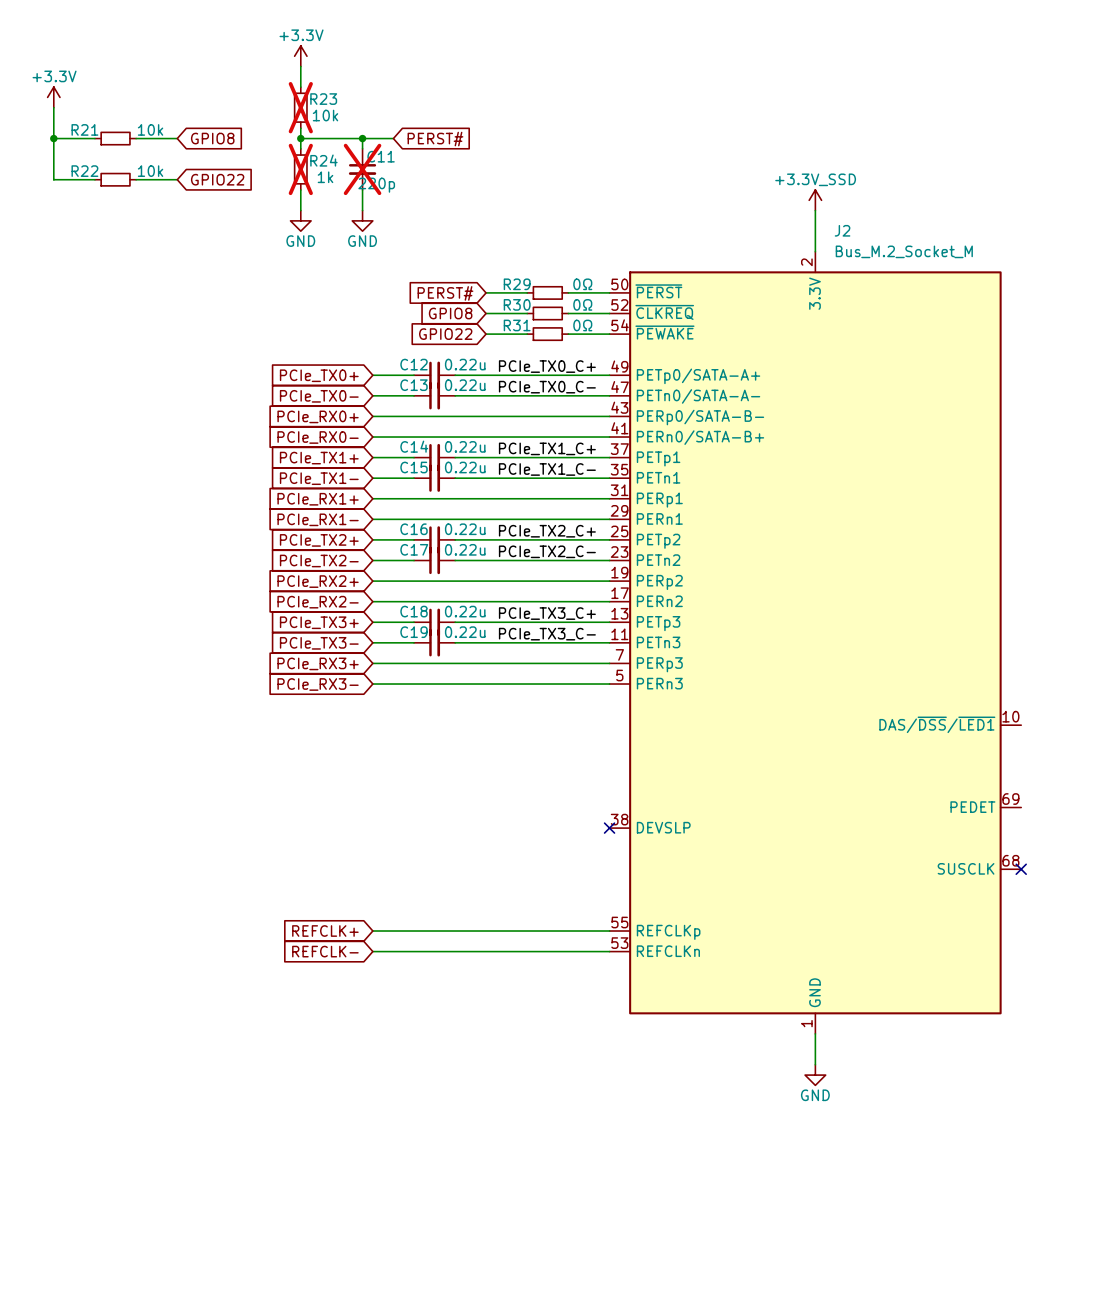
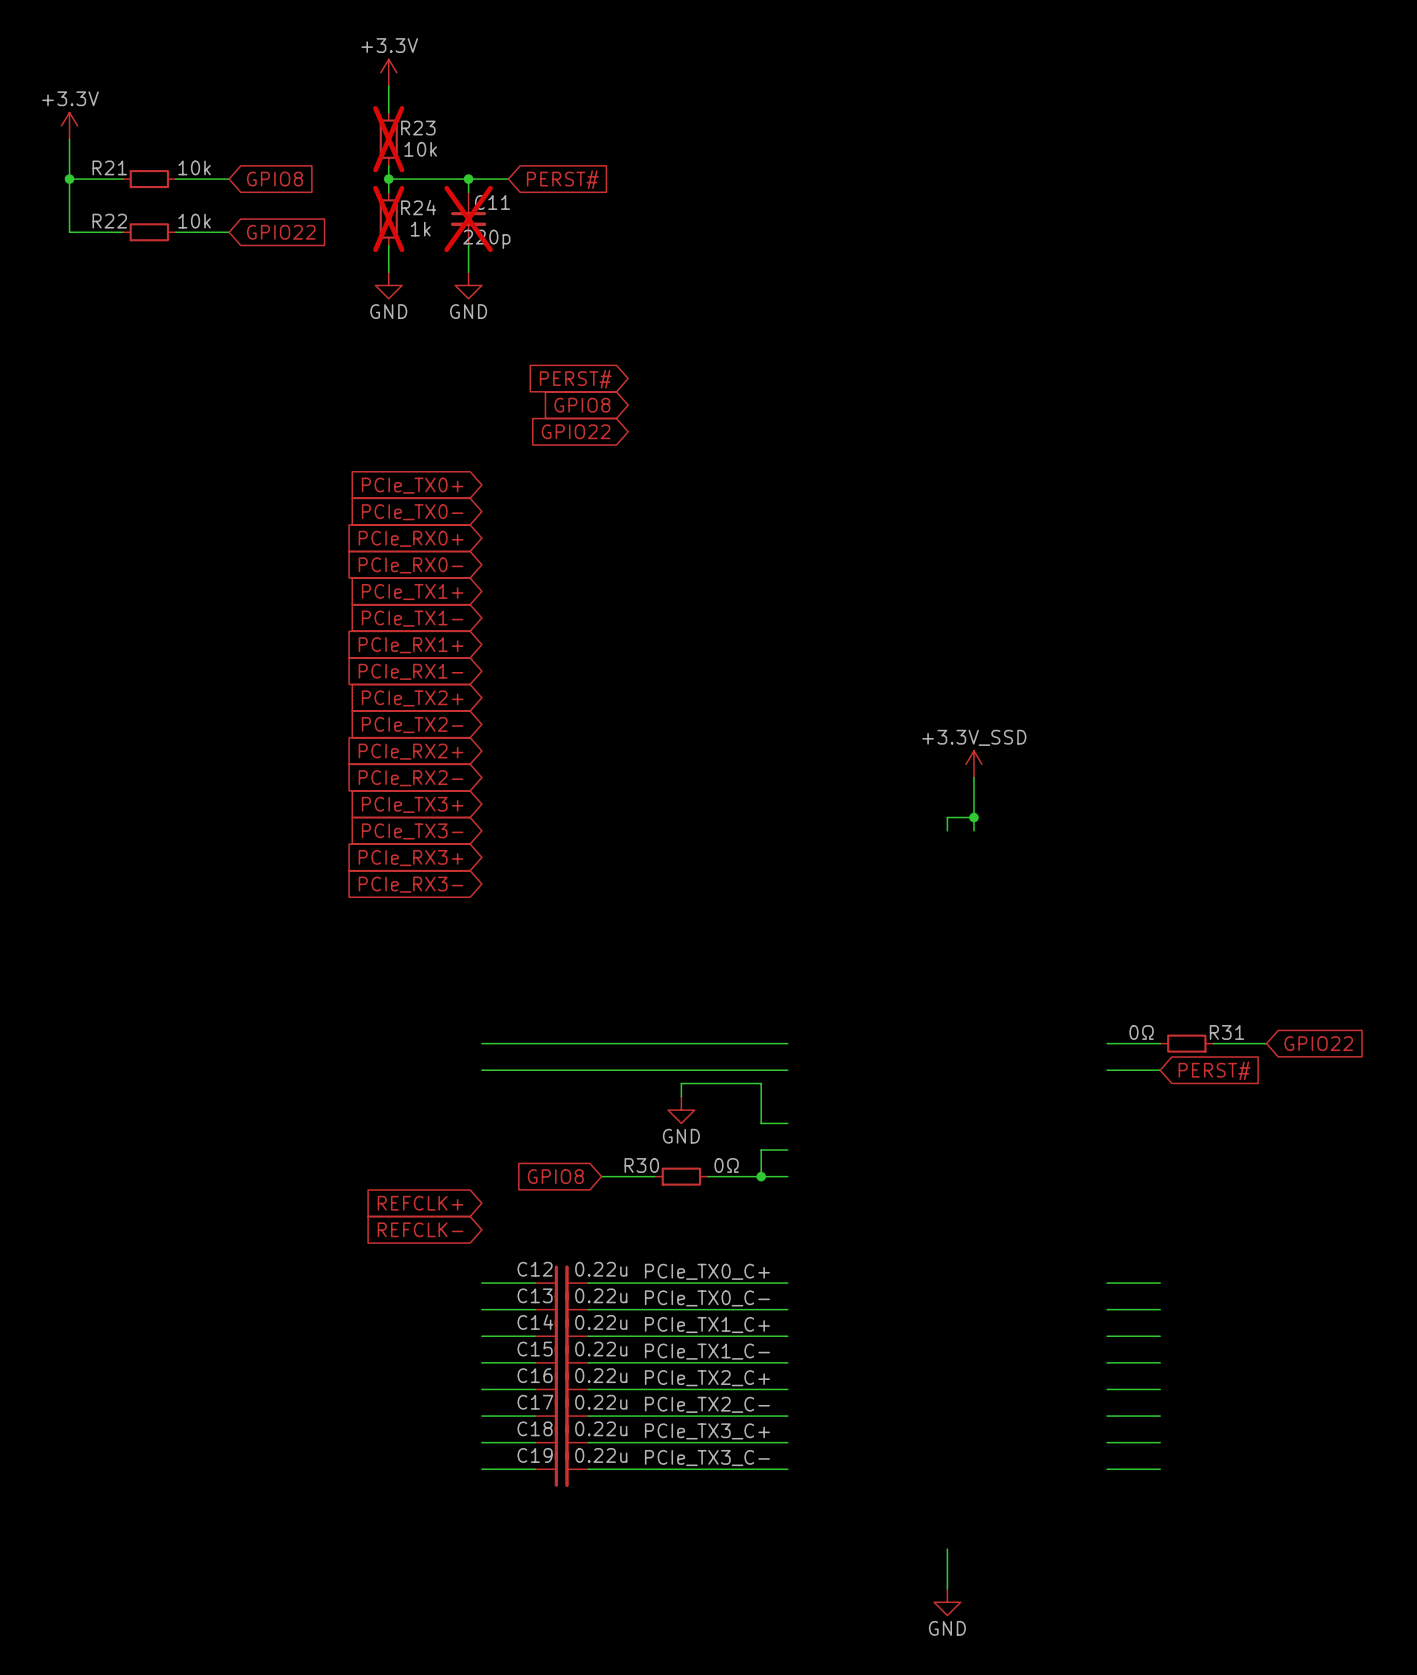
power symbol: +3.3V_SSD (815, 200) -> none
wire: (815, 210) (815, 251) -> none
wire: (486, 292) (527, 292) -> none
R29: 0Ω (547, 292) -> none
wire: (568, 292) (609, 292) -> none
wire: (486, 313) (527, 313) -> none
R30 position: (547, 313) -> (681, 1176)
wire: (568, 313) (609, 313) -> none
R31 name position: R31 (517, 325) -> R31 (1227, 1032)
R31 value position: 0Ω (582, 325) -> 0Ω (1141, 1032)
wire: (486, 334) (527, 334) -> none
R31 position: (547, 334) -> (1186, 1043)
wire: (568, 334) (609, 334) -> none
label: PCIe_TX0_C+ (547, 366) -> none
wire: (372, 375) (414, 375) -> none
C12 position: (434, 375) -> (561, 1283)
wire: (455, 375) (609, 375) -> none
label: PCIe_TX0_C- (547, 387) -> none
wire: (372, 395) (414, 395) -> none
C13 position: (434, 395) -> (561, 1309)
wire: (455, 395) (609, 395) -> none
wire: (372, 416) (609, 416) -> none
wire: (372, 437) (609, 437) -> none
label: PCIe_TX1_C+ (547, 448) -> none
wire: (372, 457) (414, 457) -> none
C14 position: (434, 457) -> (561, 1336)
wire: (455, 457) (609, 457) -> none
label: PCIe_TX1_C- (547, 469) -> none
wire: (372, 478) (414, 478) -> none
C15 position: (434, 478) -> (561, 1362)
wire: (455, 478) (609, 478) -> none
wire: (372, 498) (609, 498) -> none
wire: (372, 519) (609, 519) -> none
label: PCIe_TX2_C+ (547, 531) -> none
wire: (372, 539) (414, 539) -> none
C16 position: (434, 539) -> (561, 1389)
wire: (455, 539) (609, 539) -> none
label: PCIe_TX2_C- (547, 551) -> none
wire: (372, 560) (414, 560) -> none
C17 position: (434, 560) -> (561, 1416)
wire: (455, 560) (609, 560) -> none
wire: (372, 581) (609, 581) -> none
power symbol: none -> +3.3V_SSD (974, 764)
wire: (372, 601) (609, 601) -> none
label: PCIe_TX3_C+ (547, 613) -> none
wire: (372, 622) (414, 622) -> none
C18 position: (434, 622) -> (561, 1442)
wire: (455, 622) (609, 622) -> none
junction: none -> (974, 817)
label: PCIe_TX3_C- (547, 634) -> none
wire: (372, 642) (414, 642) -> none
C19 position: (434, 642) -> (561, 1469)
wire: (455, 642) (609, 642) -> none
J2: Bus_M.2_Socket_M (815, 642) -> none
wire: (372, 663) (609, 663) -> none
wire: (372, 684) (609, 684) -> none
global label: none -> GPIO22 (1318, 1043)
no-connect mark: (609, 828) -> none
global label: none -> PERST# (1214, 1070)
wire: none -> (681, 1096) (681, 1083) (761, 1083) (761, 1123) (787, 1123)
power symbol: none -> GND (681, 1110)
no-connect mark: (1021, 869) -> none
wire: none -> (787, 1150) (761, 1150) (761, 1176)
global label: none -> GPIO8 (555, 1176)
wire: none -> (601, 1176) (654, 1176)
wire: none -> (707, 1176) (787, 1176)
junction: none -> (761, 1176)
wire: (372, 931) (609, 931) -> (481, 1043) (787, 1043)
wire: (372, 951) (609, 951) -> (481, 1070) (787, 1070)
label: none -> PCIe_TX0_C+ (707, 1271)
wire: none -> (481, 1283) (535, 1283)
wire: none -> (588, 1283) (787, 1283)
label: none -> PCIe_TX0_C- (707, 1298)
wire: none -> (481, 1309) (535, 1309)
wire: none -> (588, 1309) (787, 1309)
label: none -> PCIe_TX1_C+ (707, 1325)
wire: none -> (481, 1336) (535, 1336)
wire: none -> (588, 1336) (787, 1336)
wire: (815, 1033) (815, 1064) -> (947, 1549) (947, 1588)
wire: none -> (1107, 1336) (1160, 1336)
label: none -> PCIe_TX1_C- (707, 1351)
wire: none -> (481, 1362) (535, 1362)
wire: none -> (588, 1362) (787, 1362)
wire: none -> (1107, 1362) (1160, 1362)
label: none -> PCIe_TX2_C+ (707, 1378)
wire: none -> (481, 1389) (535, 1389)
wire: none -> (588, 1389) (787, 1389)
power symbol: GND (815, 1075) -> none
wire: none -> (1107, 1389) (1160, 1389)
label: none -> PCIe_TX2_C- (707, 1404)
wire: none -> (481, 1416) (535, 1416)
wire: none -> (588, 1416) (787, 1416)
wire: none -> (1107, 1416) (1160, 1416)
label: none -> PCIe_TX3_C+ (707, 1431)
wire: none -> (481, 1442) (535, 1442)
wire: none -> (588, 1442) (787, 1442)
wire: none -> (1107, 1442) (1160, 1442)
label: none -> PCIe_TX3_C- (707, 1458)
wire: none -> (481, 1469) (535, 1469)
wire: none -> (588, 1469) (787, 1469)
wire: none -> (1107, 1469) (1160, 1469)
power symbol: none -> GND (947, 1602)

